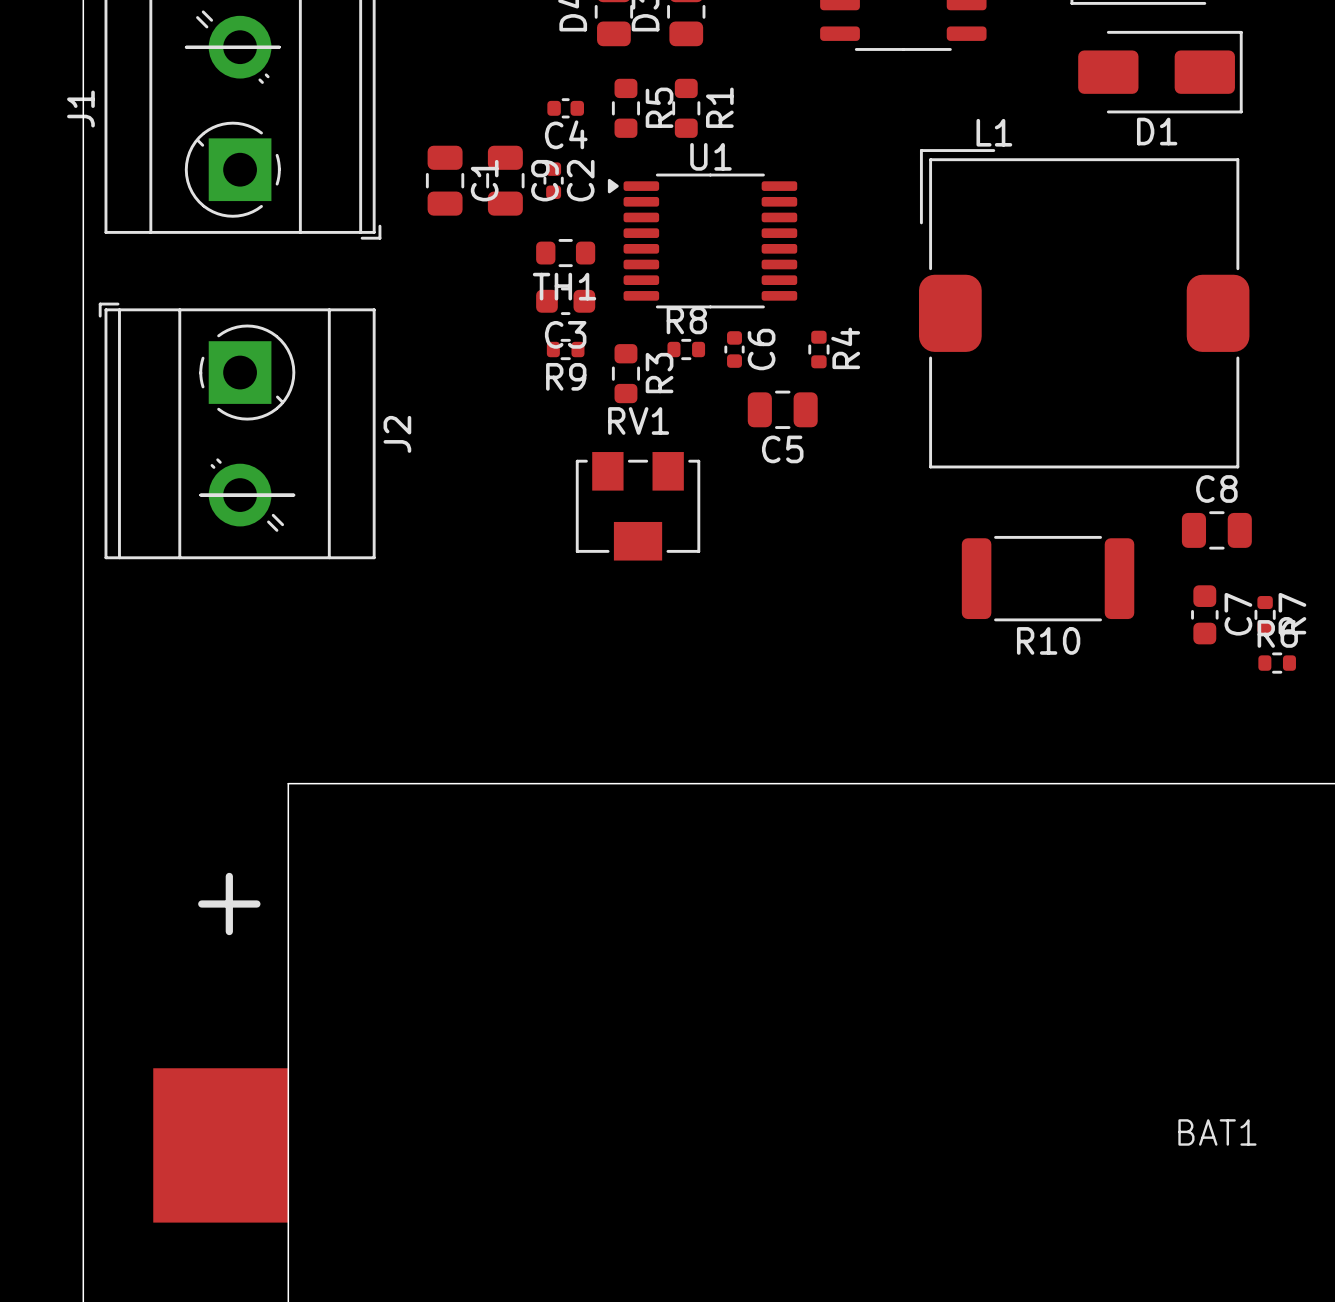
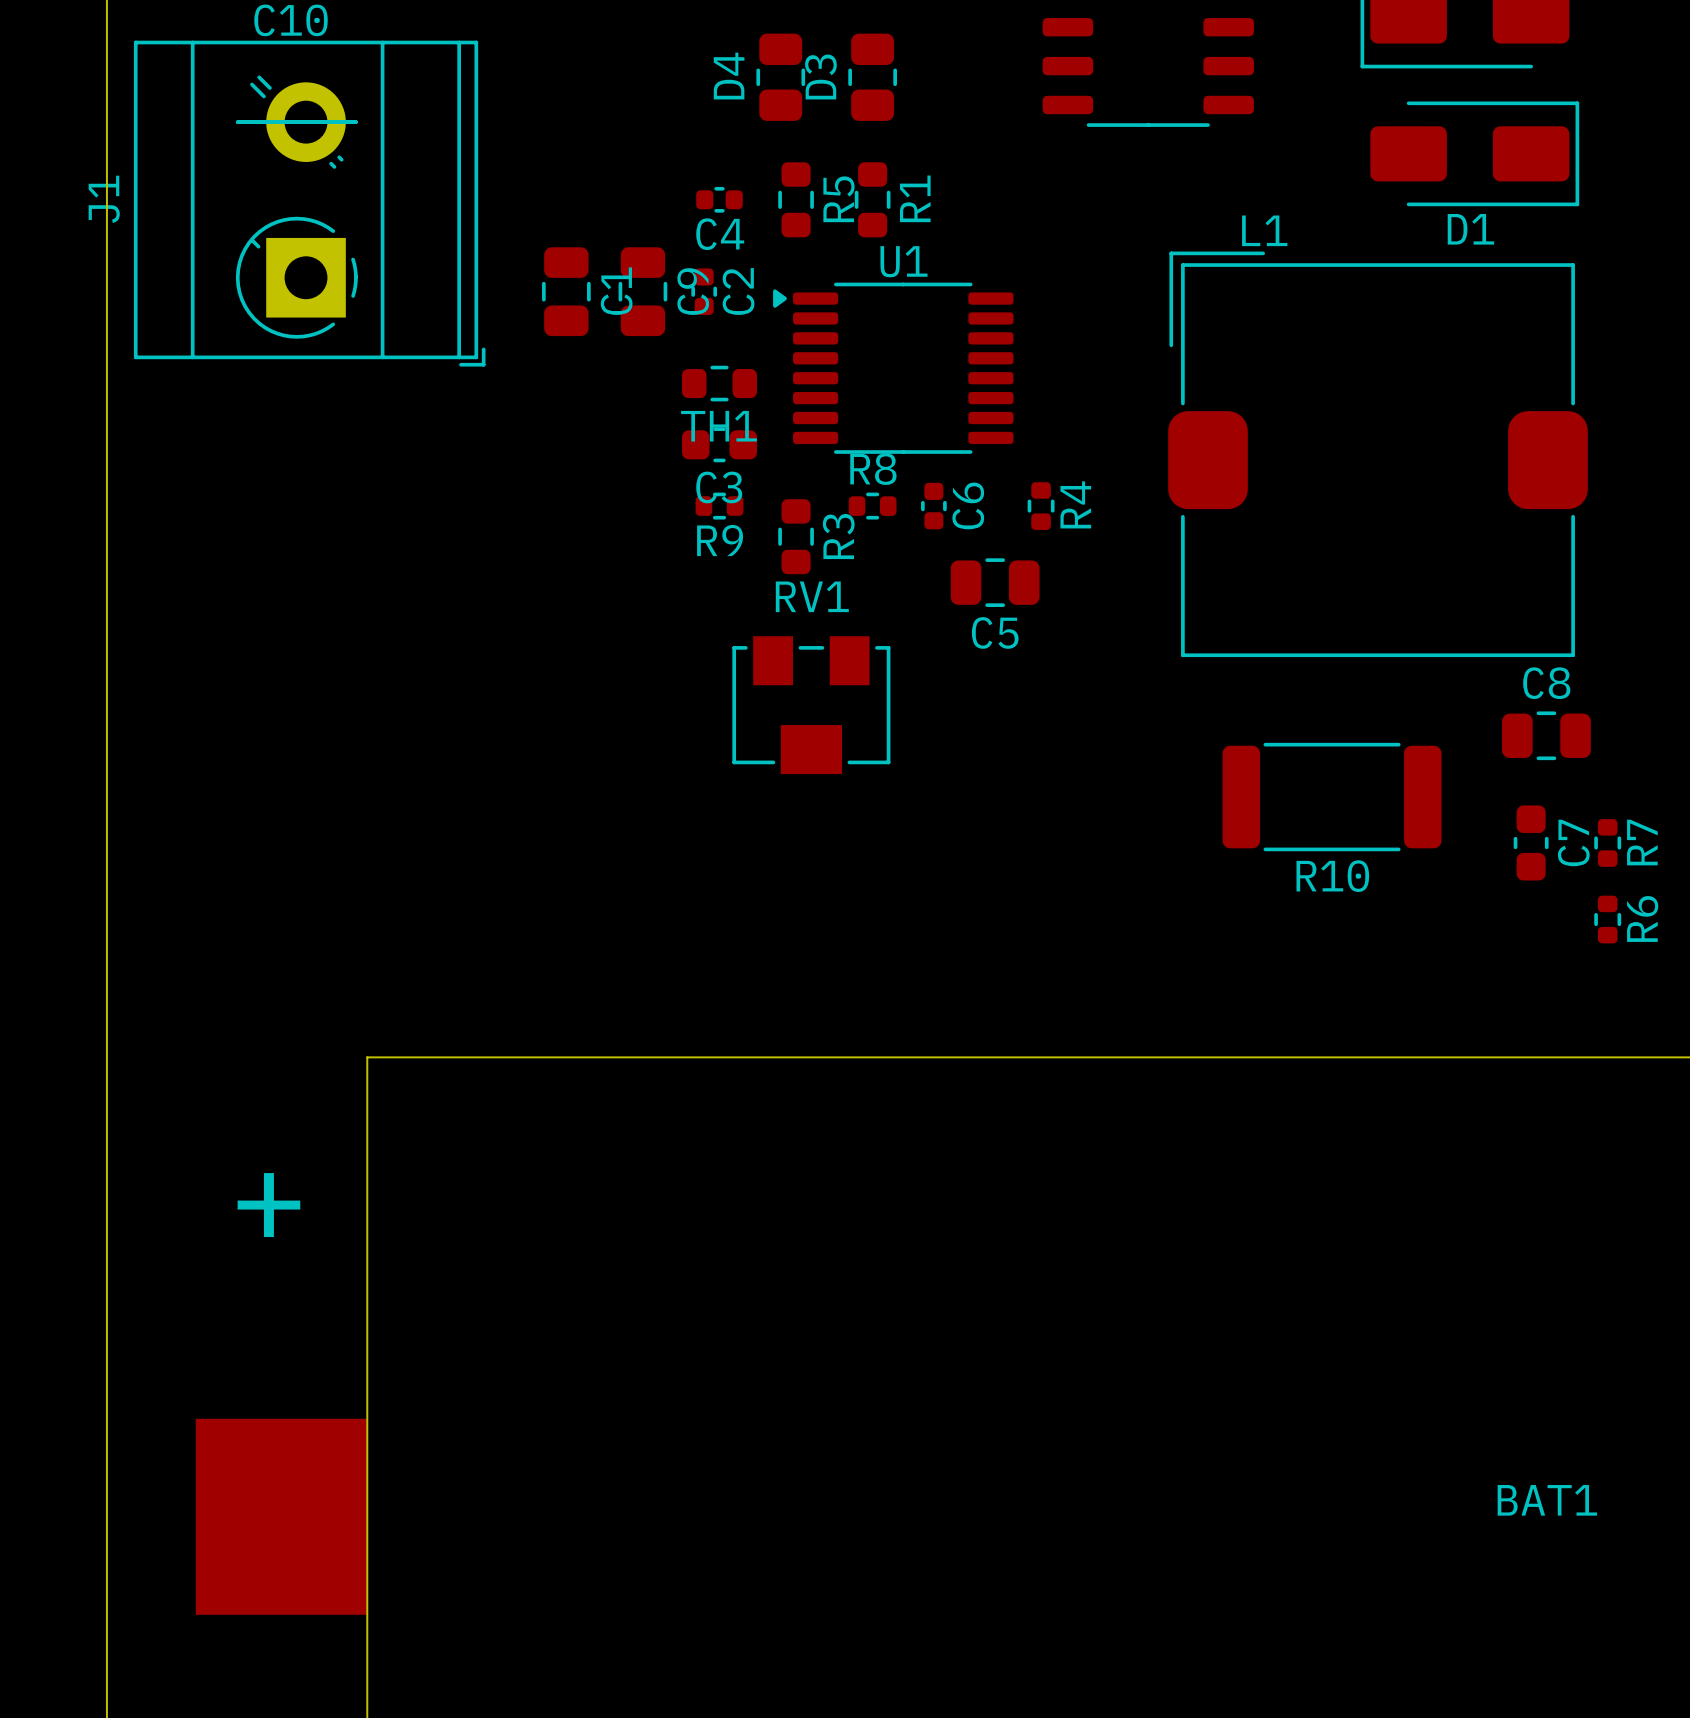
J2: (237, 430) -> none
R6 rotation: 0° (1277, 663) -> 90° clockwise (1607, 919)

